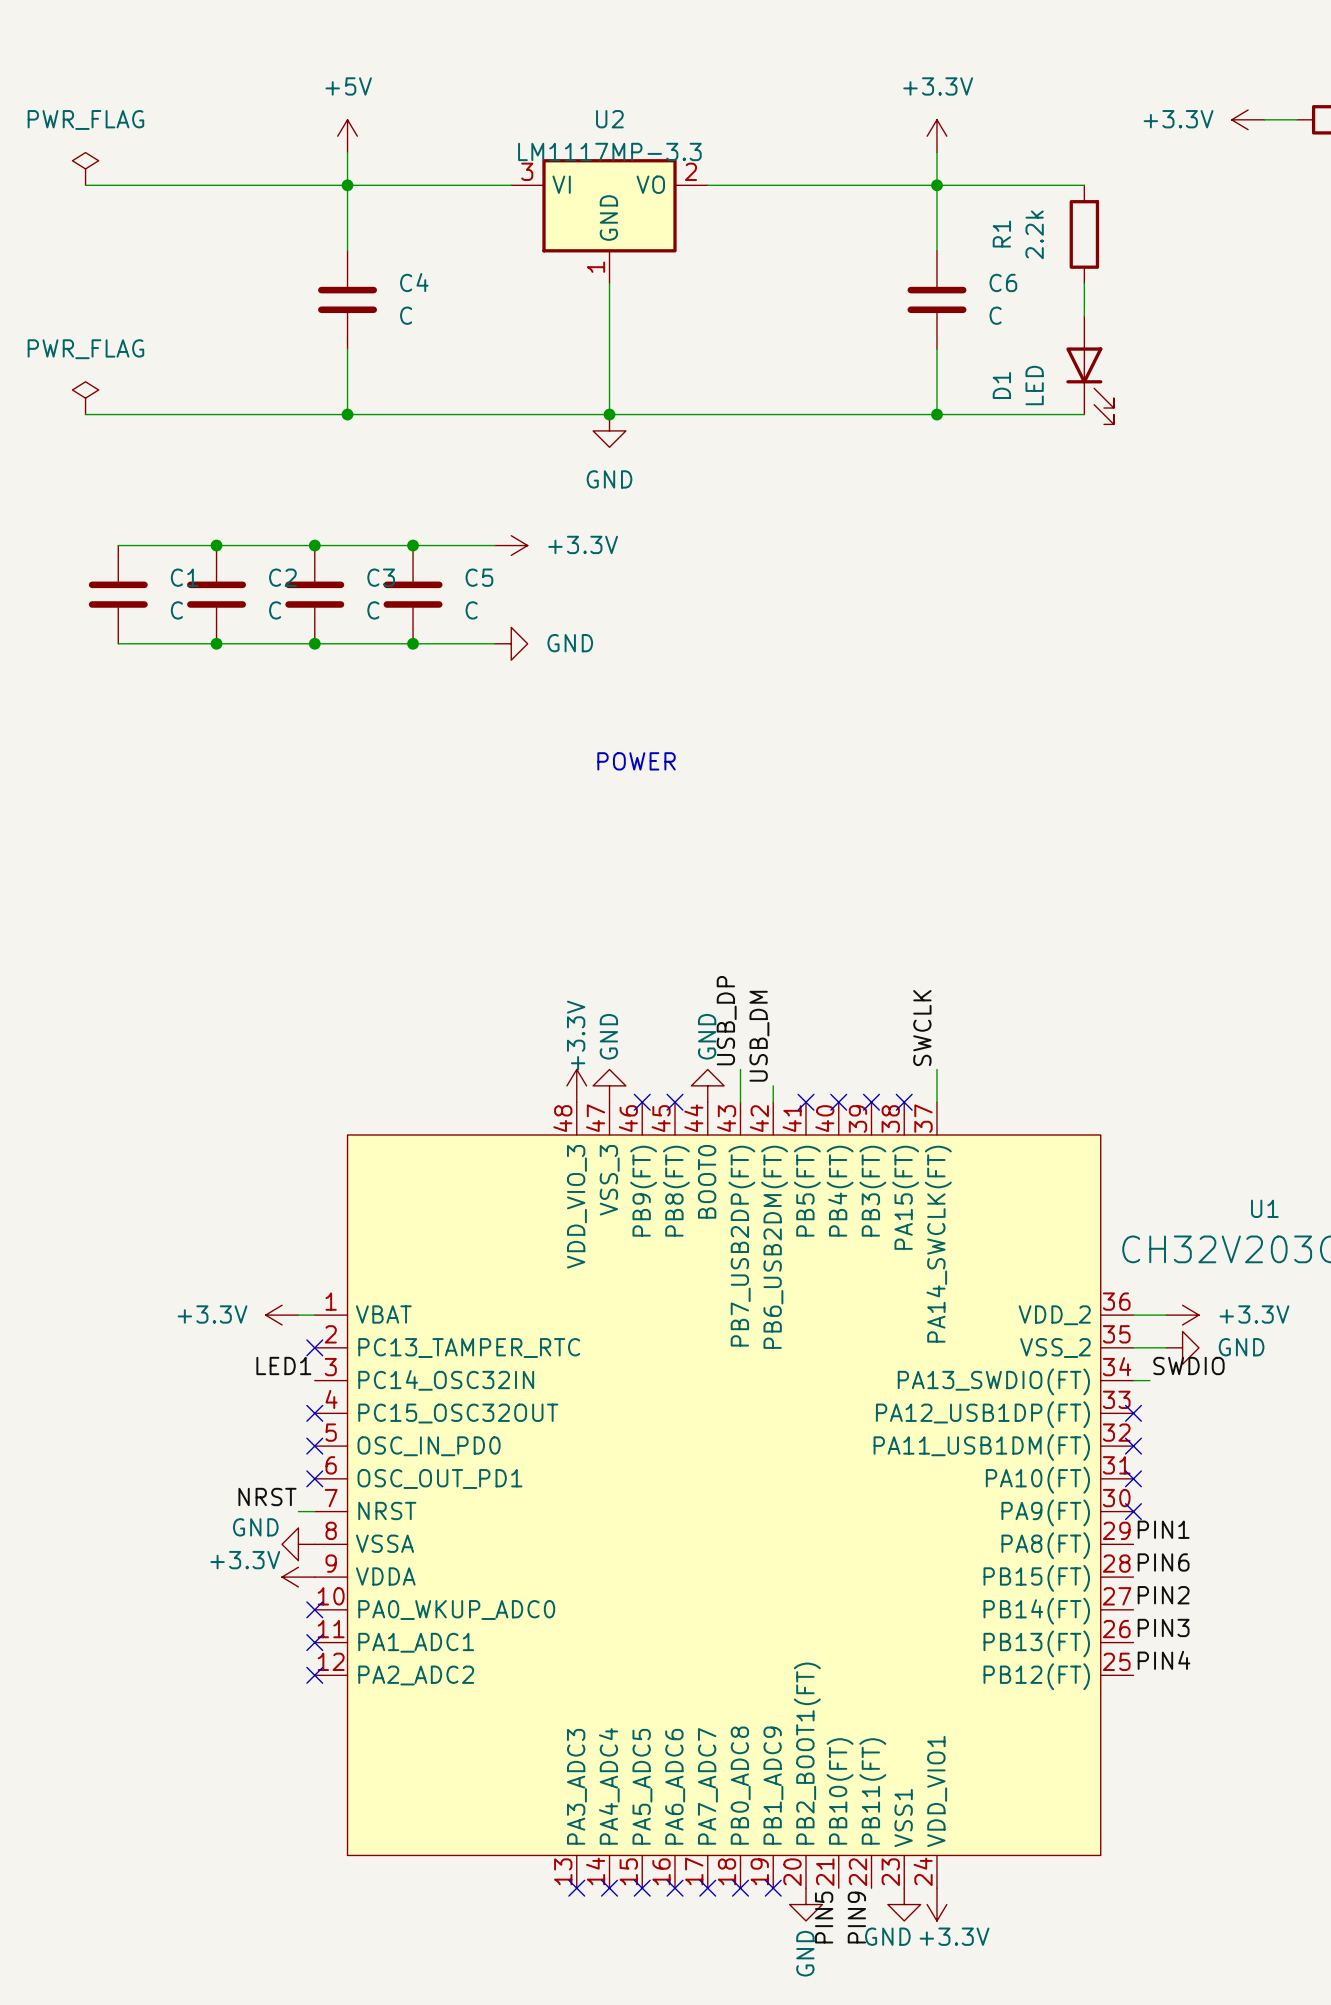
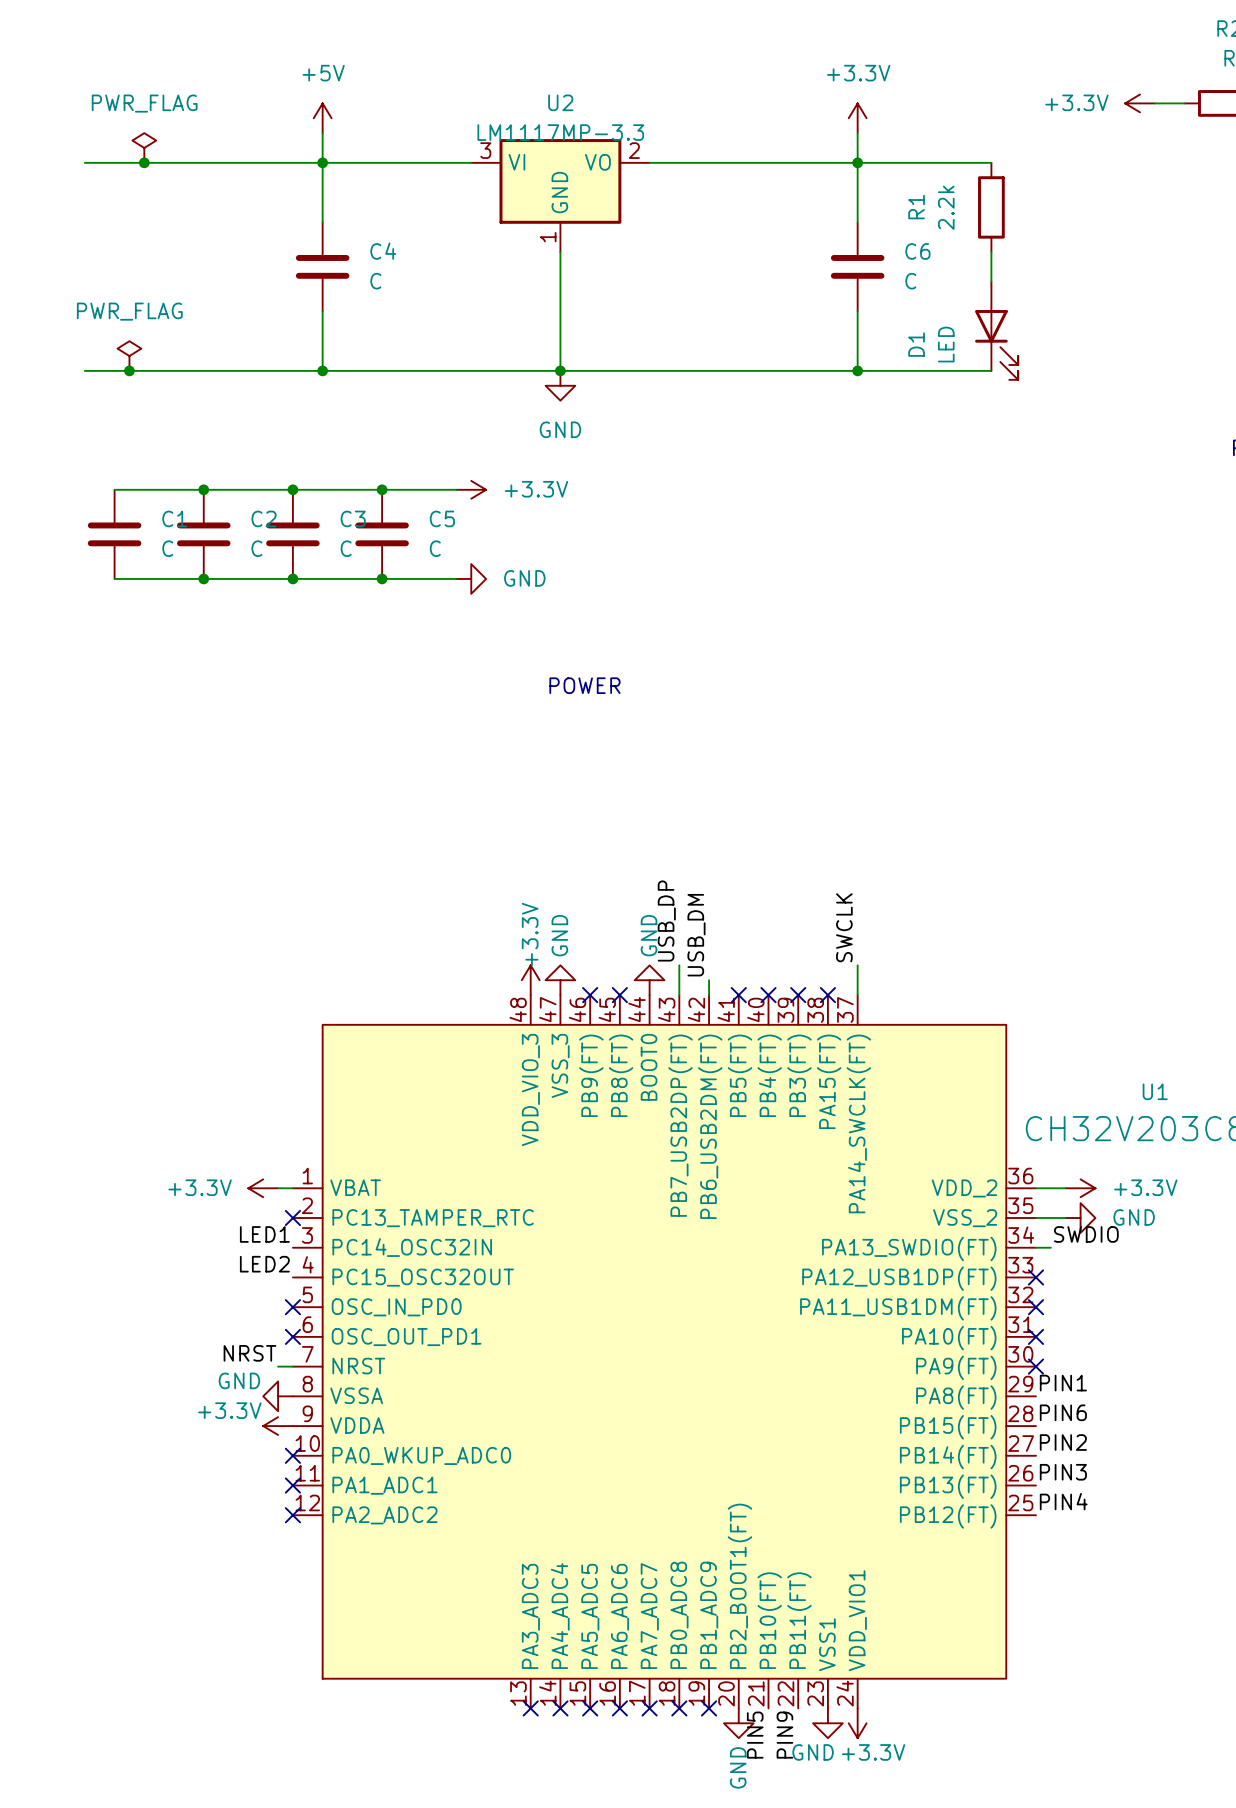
power symbol position: PWR_FLAG (85, 168) -> PWR_FLAG (144, 147)
junction: none -> (144, 162)
power symbol position: PWR_FLAG (85, 398) -> PWR_FLAG (129, 356)
junction: none -> (129, 370)
label: none -> LED2 (264, 1264)
no-connect mark: (314, 1413) -> none

